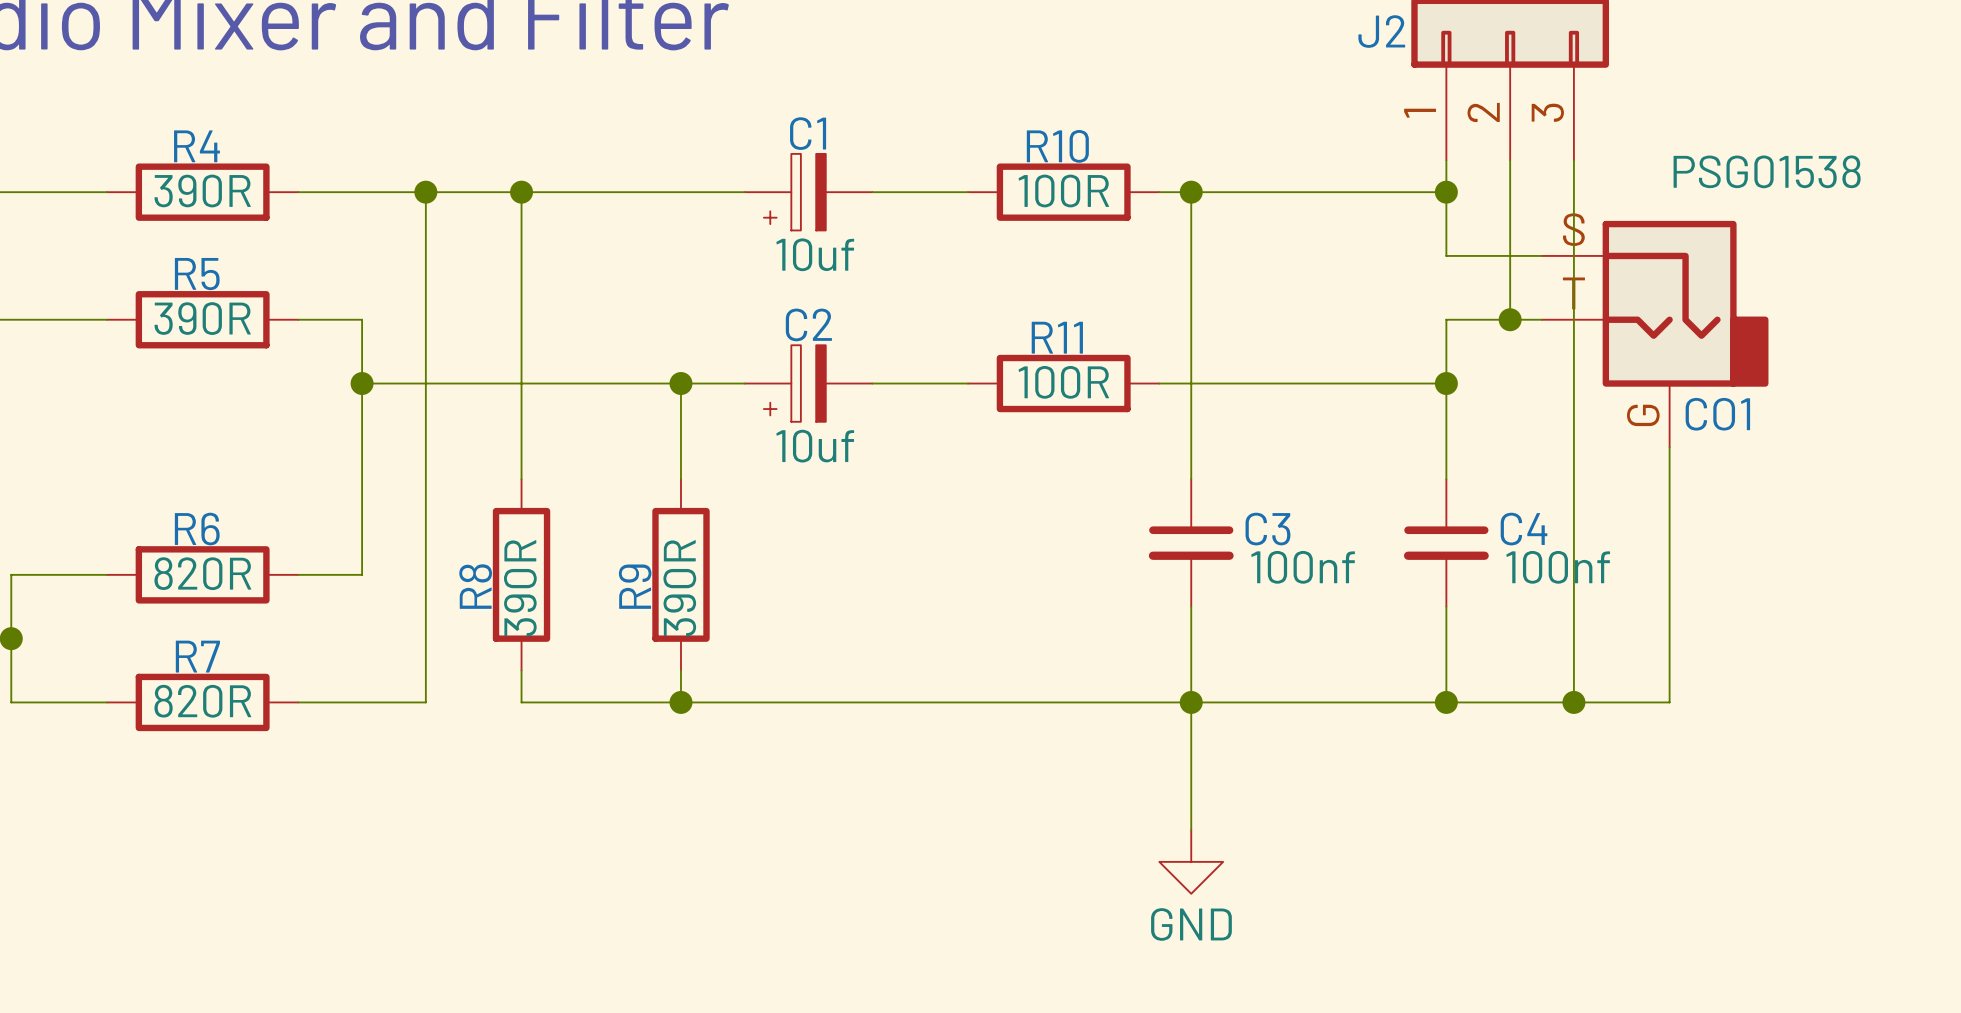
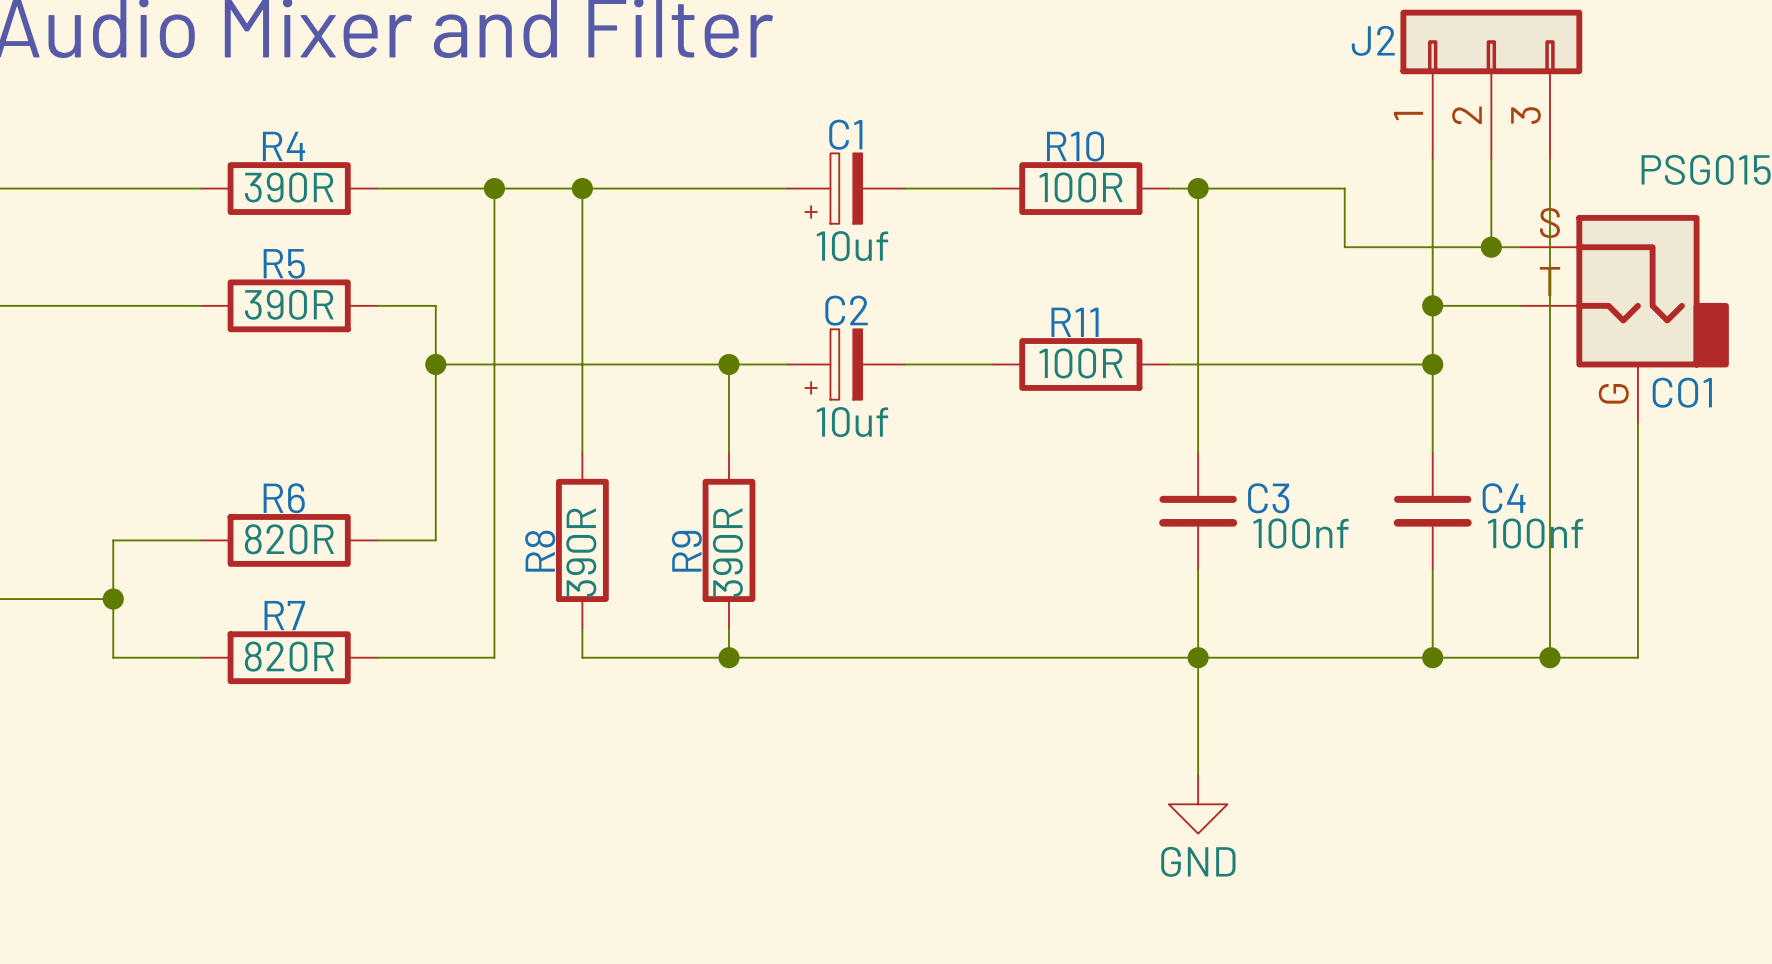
wire: (1350, 192) (1446, 192) -> (1344, 188) (1344, 247) (1432, 247) (1432, 305)
junction: (1446, 192) -> none
wire: (1510, 255) (1510, 319) -> none
junction: none -> (1491, 247)
junction: none -> (1432, 305)
junction: (1510, 319) -> none

